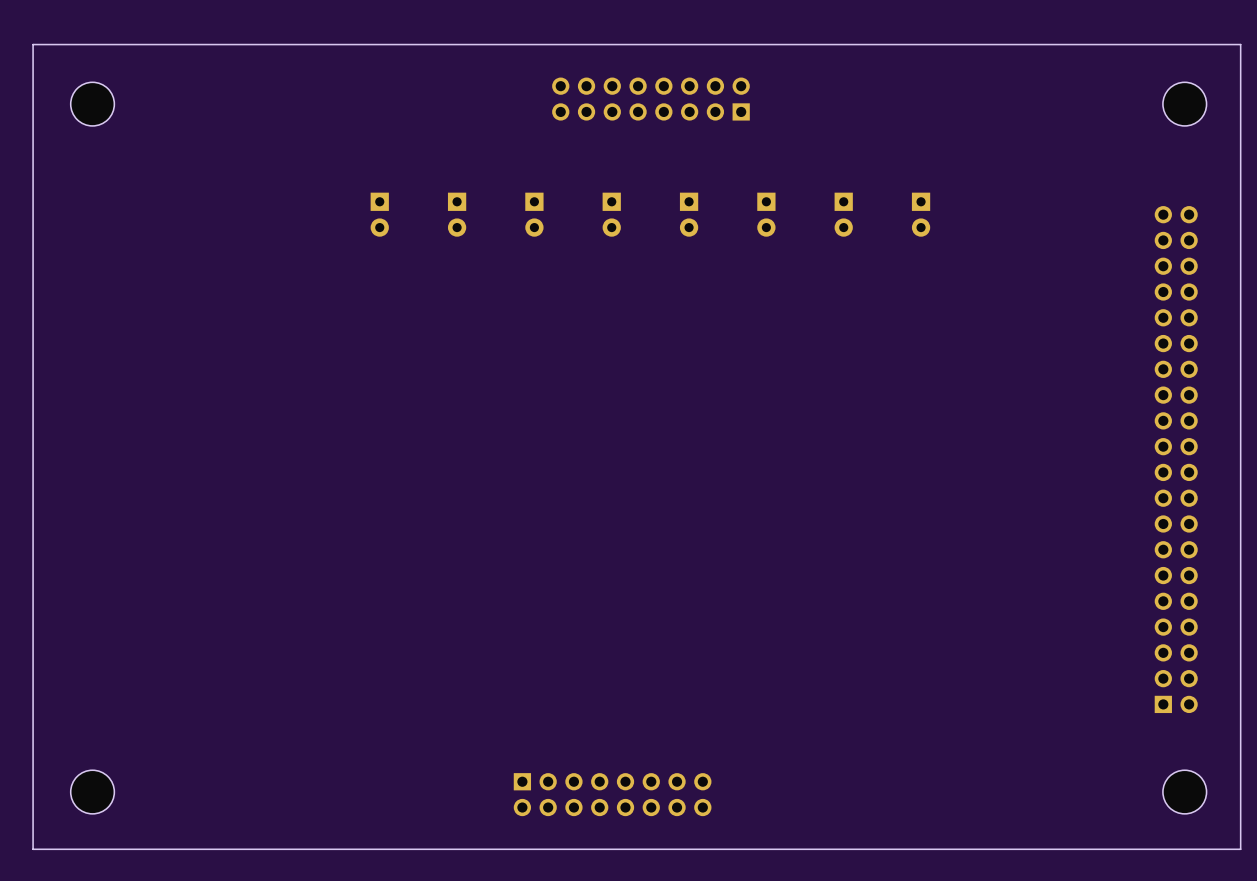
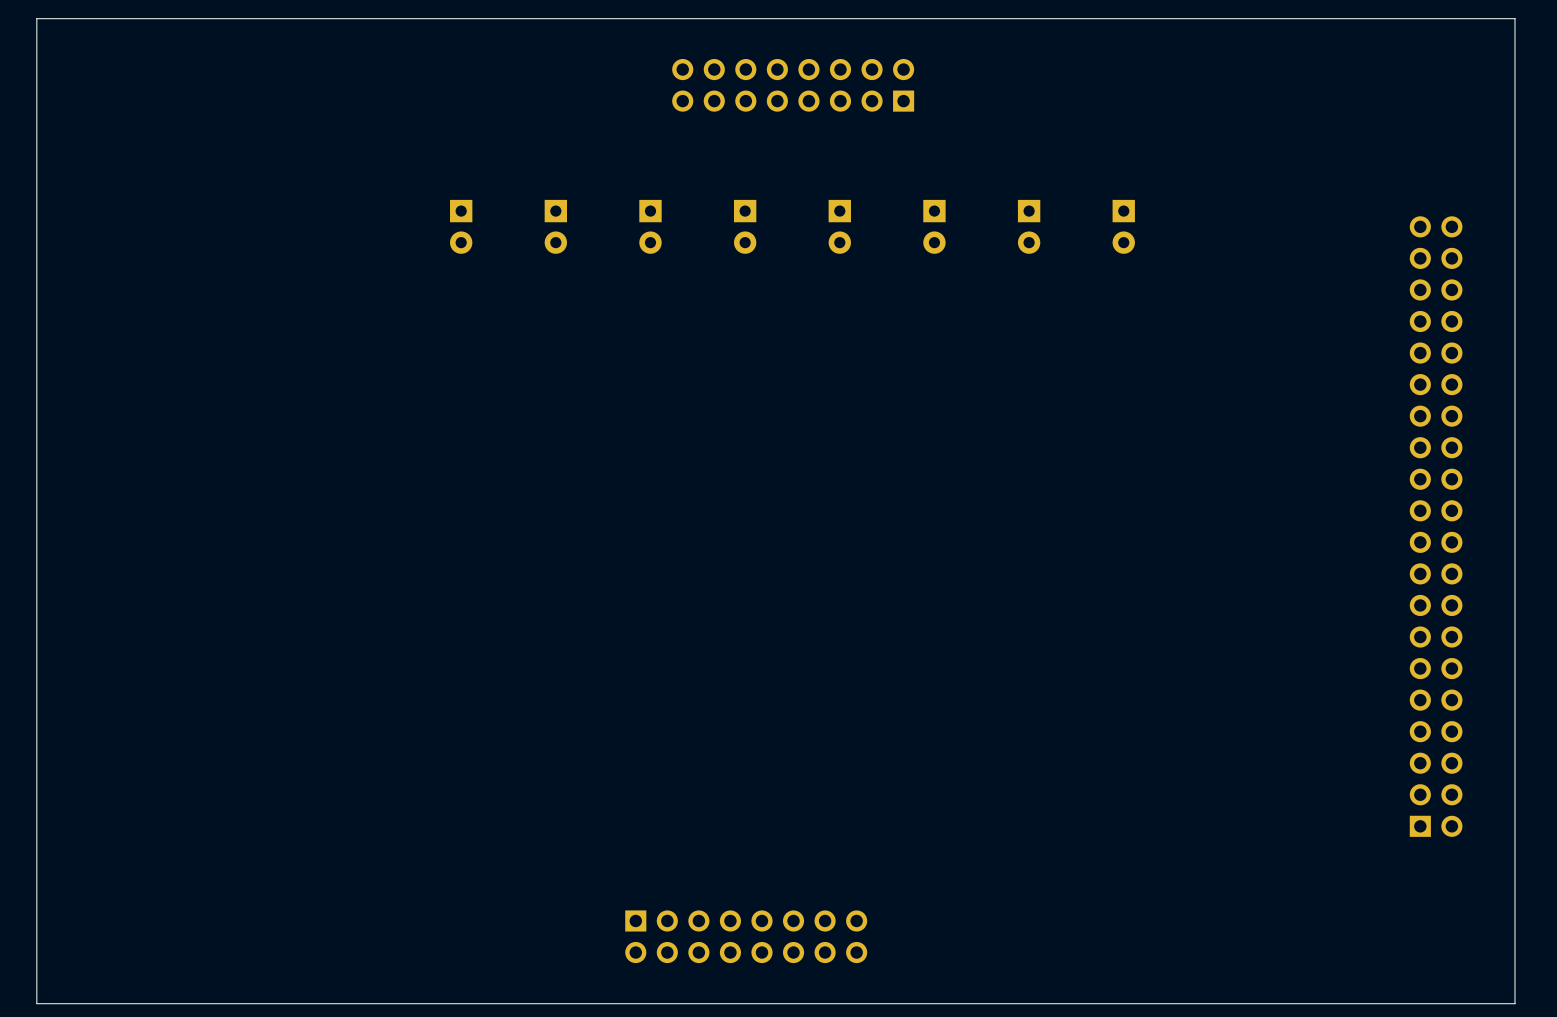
part: (92, 104) -> none
part: (1184, 104) -> none
part: (92, 792) -> none
part: (1184, 792) -> none

